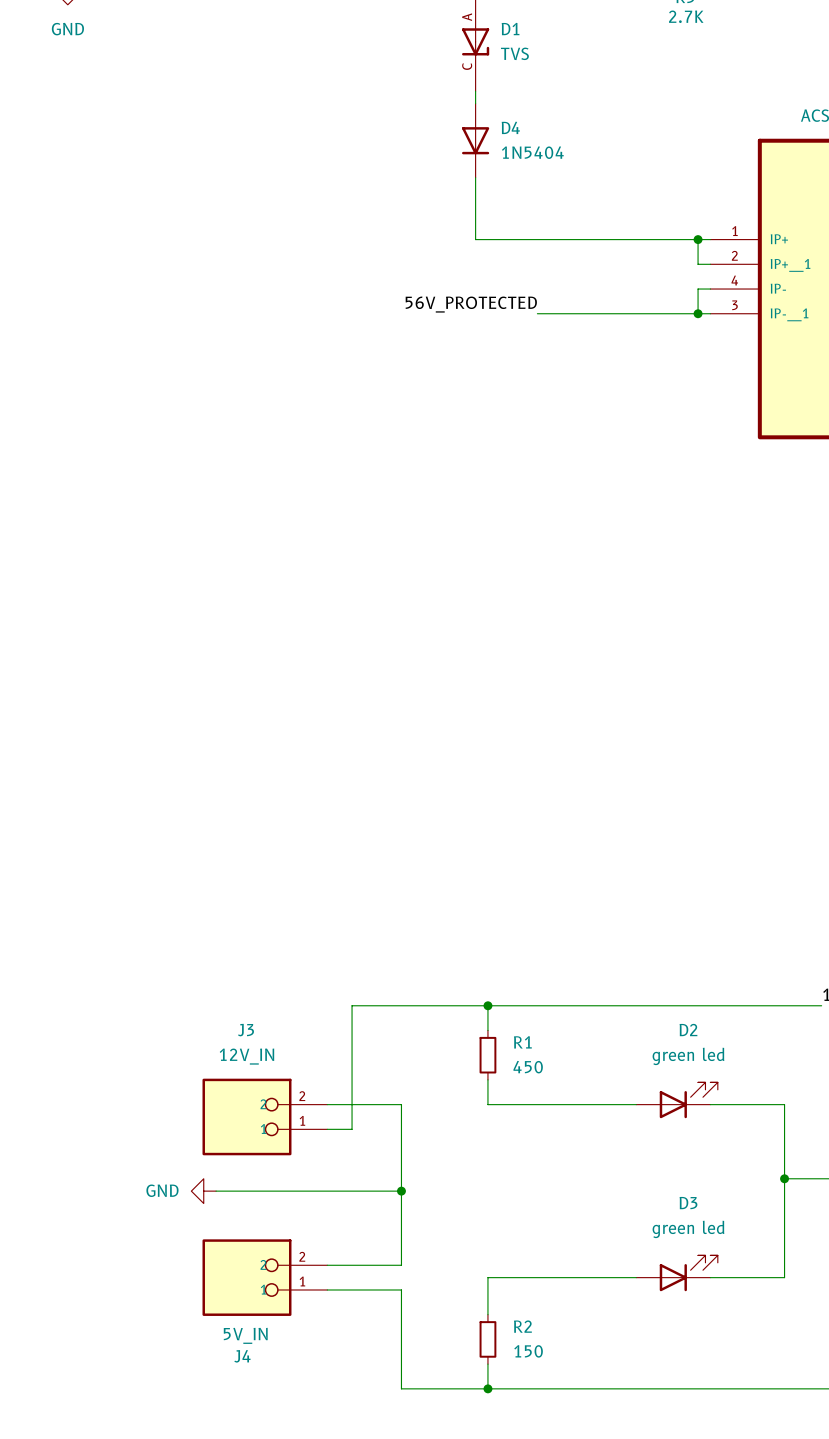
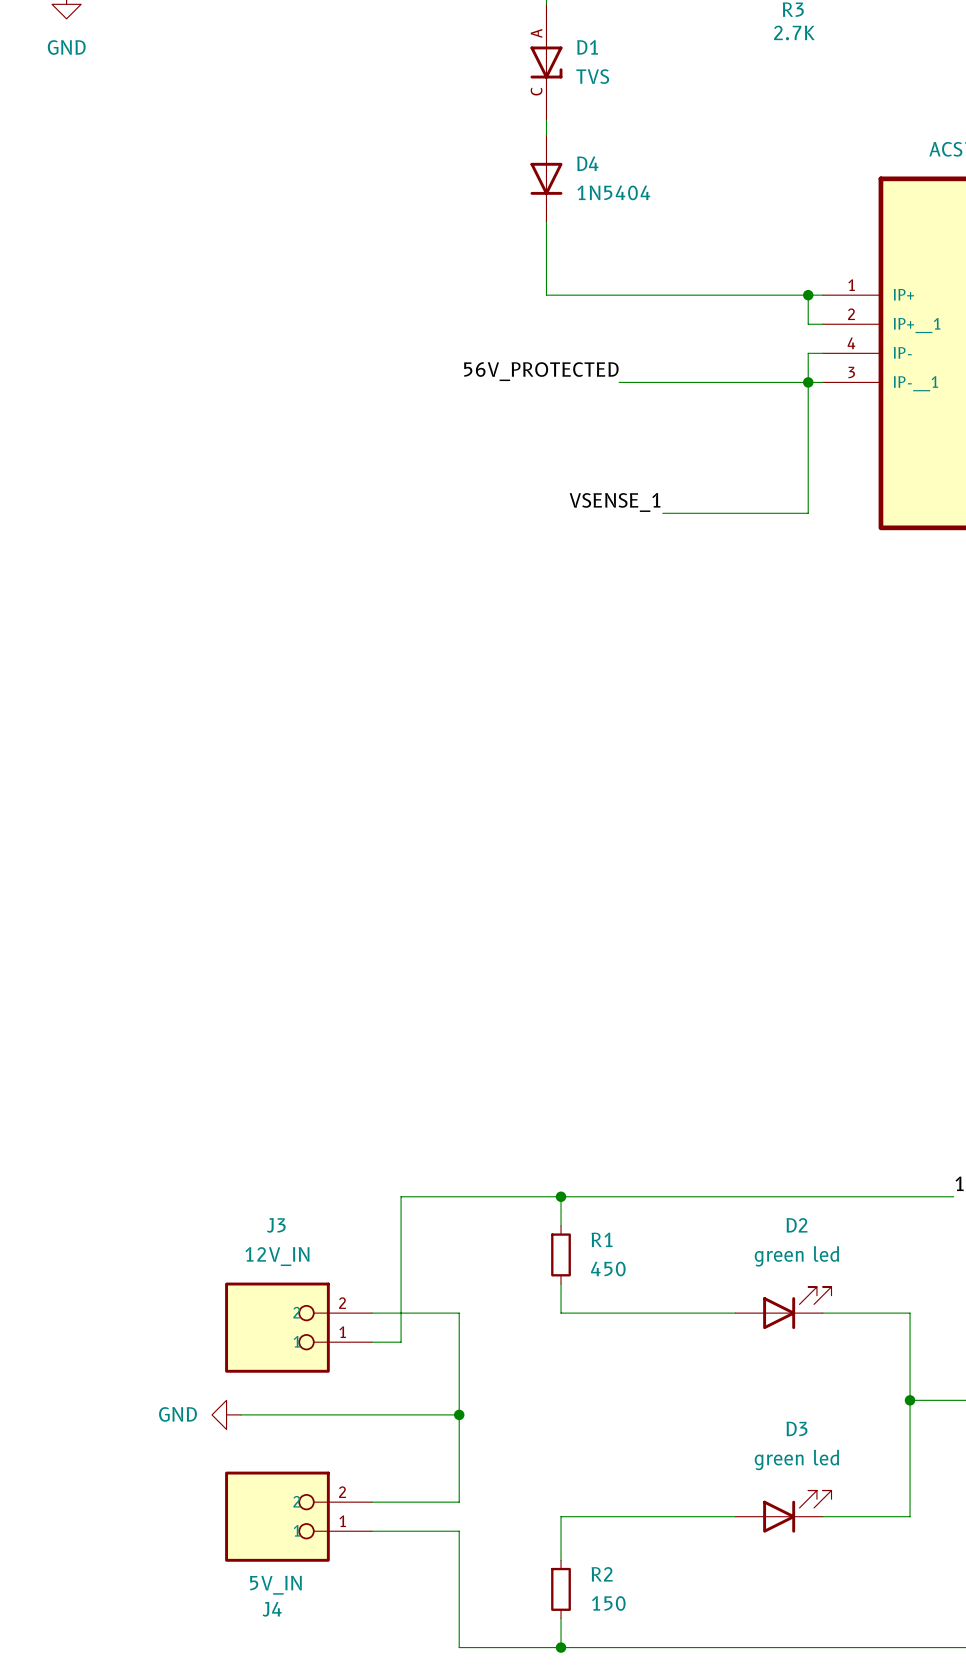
wire: none -> (808, 382) (808, 513) (662, 513)
label: none -> VSENSE_1 (615, 502)

